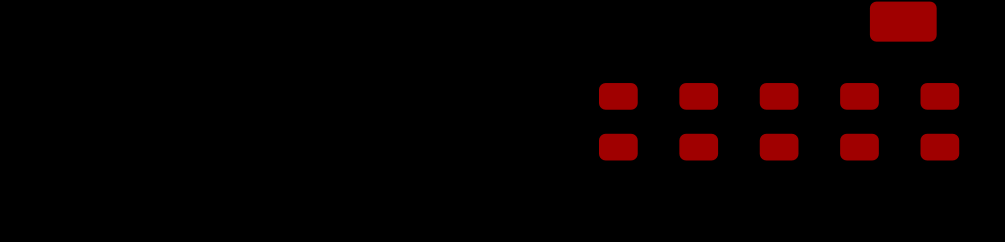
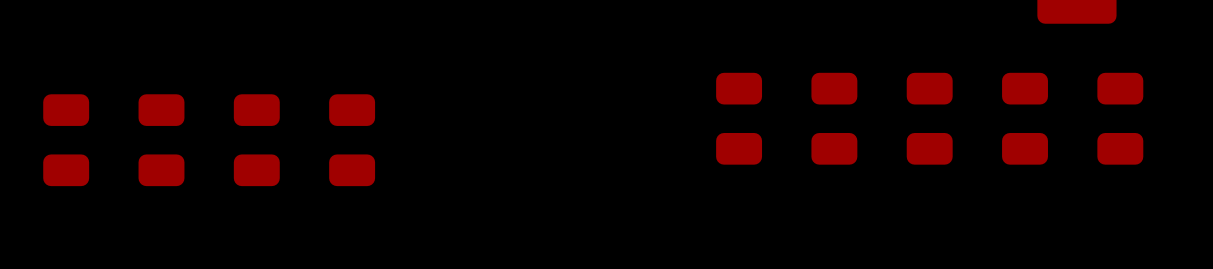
part: none -> (66, 140)
part: none -> (161, 140)
part: none -> (256, 140)
part: none -> (352, 140)

